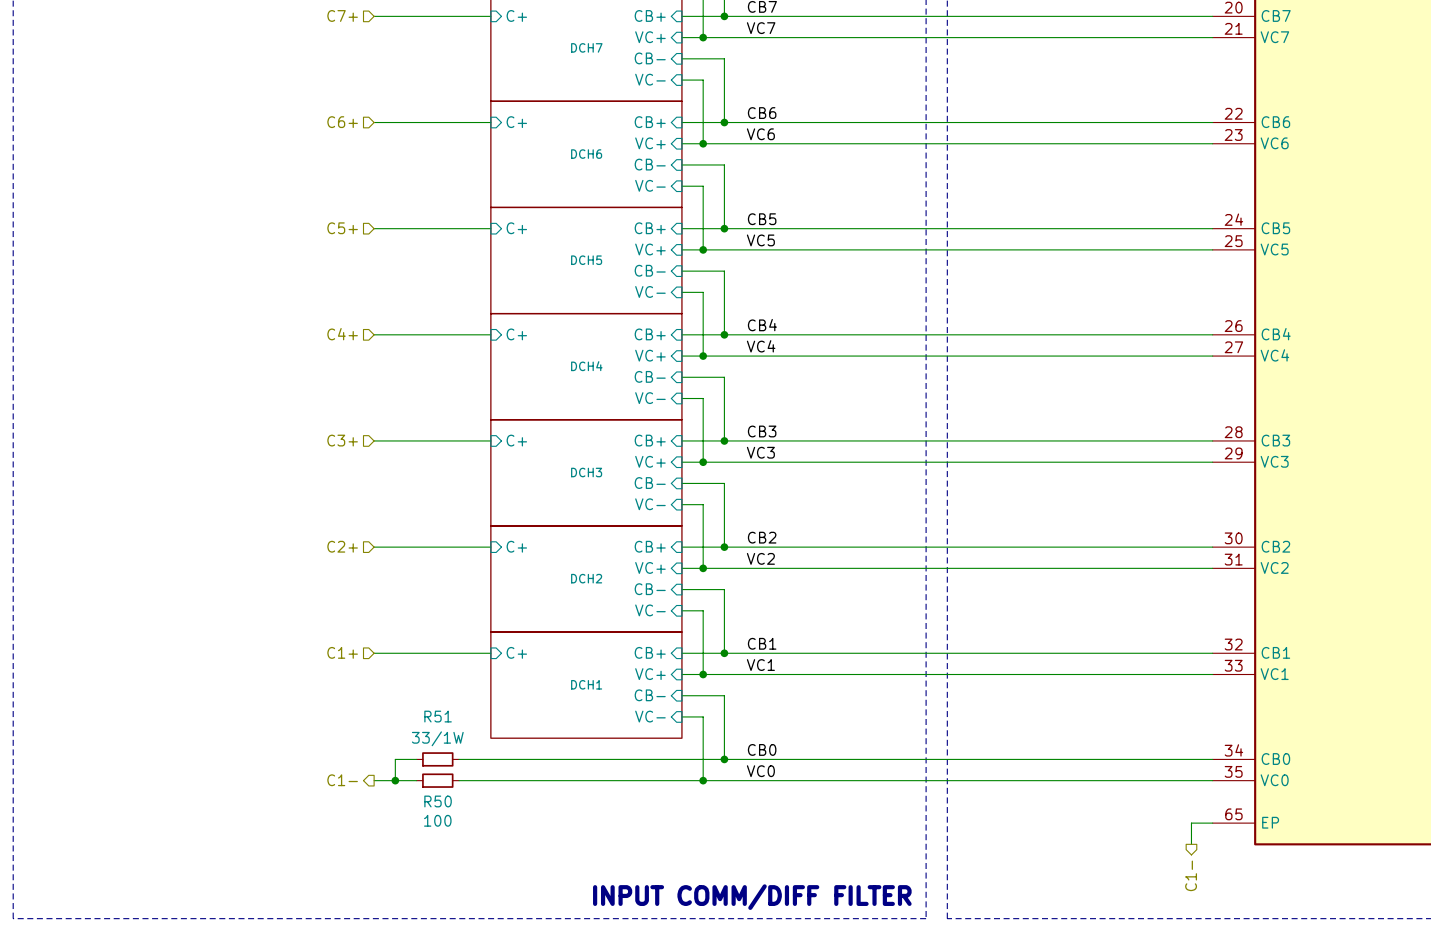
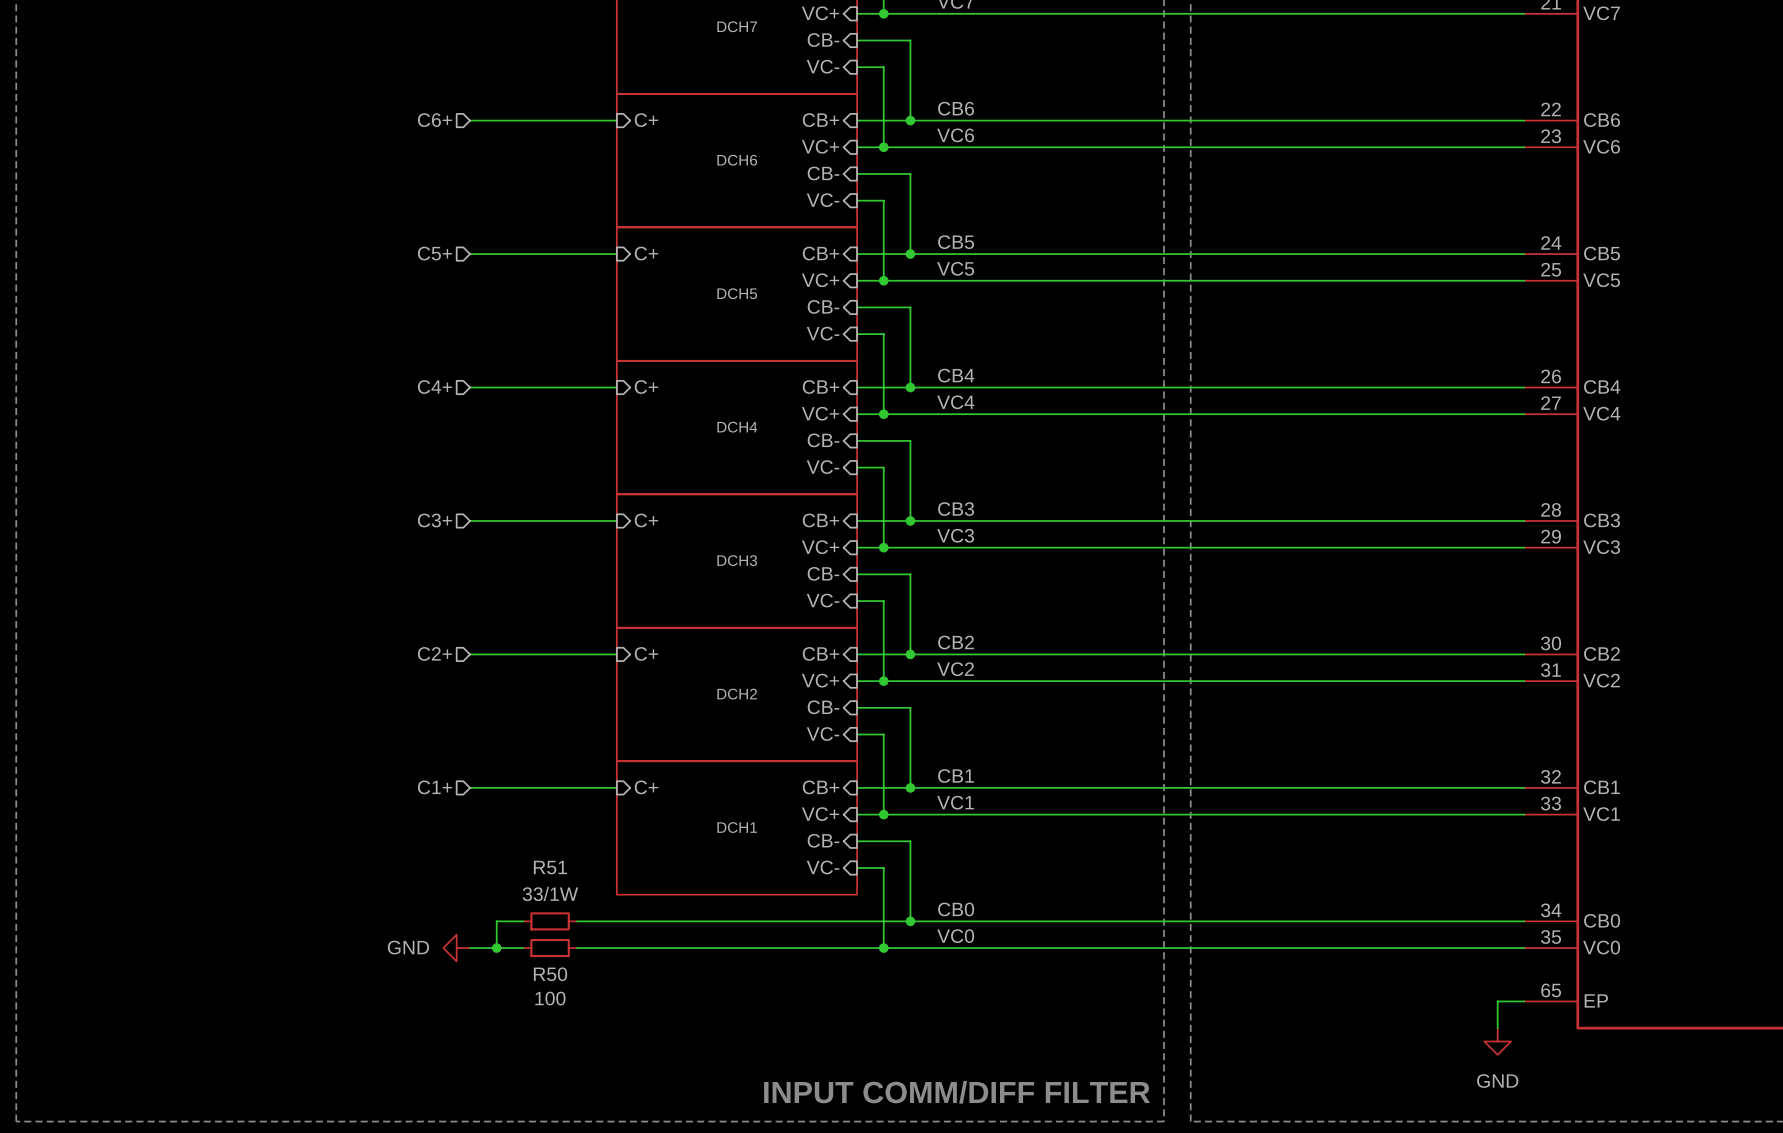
hierarchical label: C1- (342, 780) -> none
power symbol: none -> GND (456, 948)
power symbol: none -> GND (1497, 1041)
hierarchical label: C1- (1191, 875) -> none

